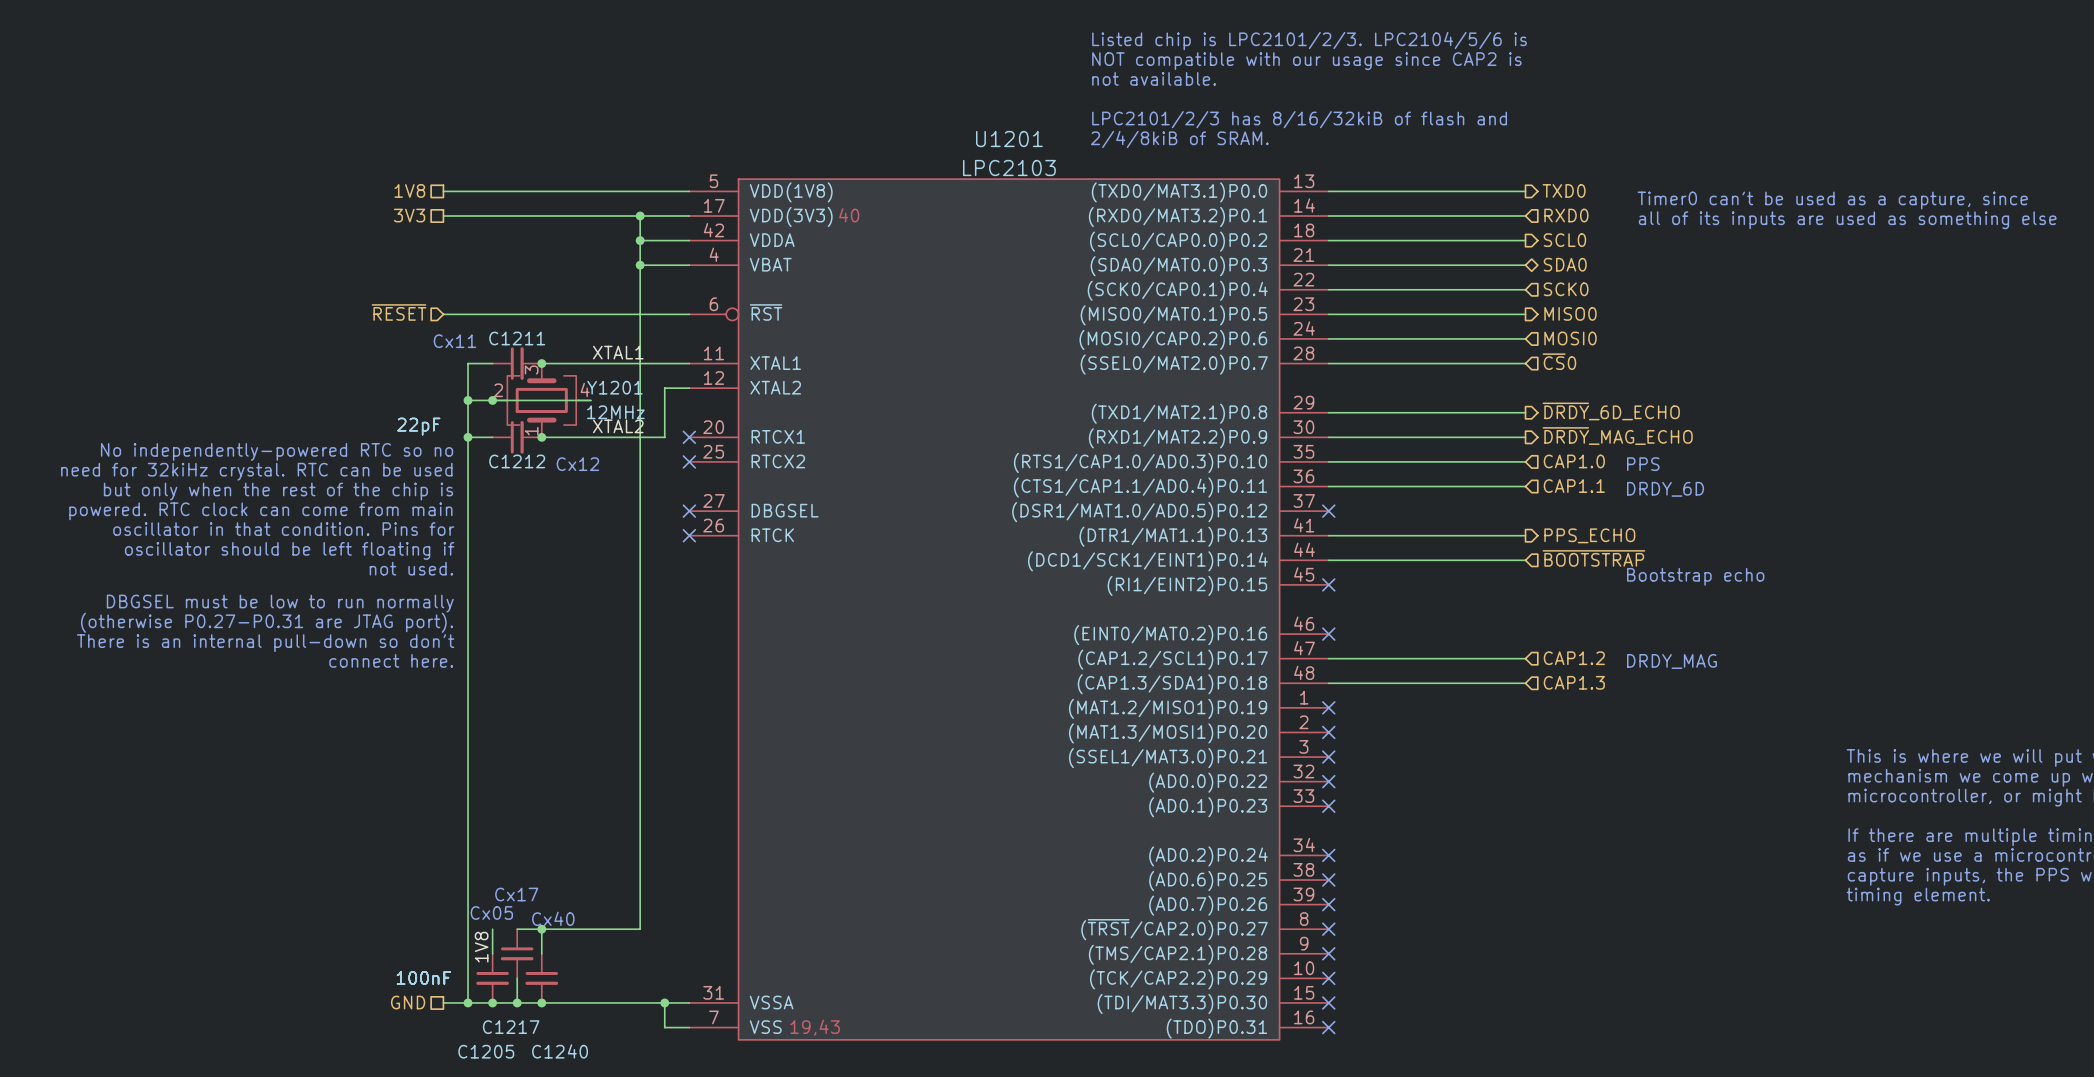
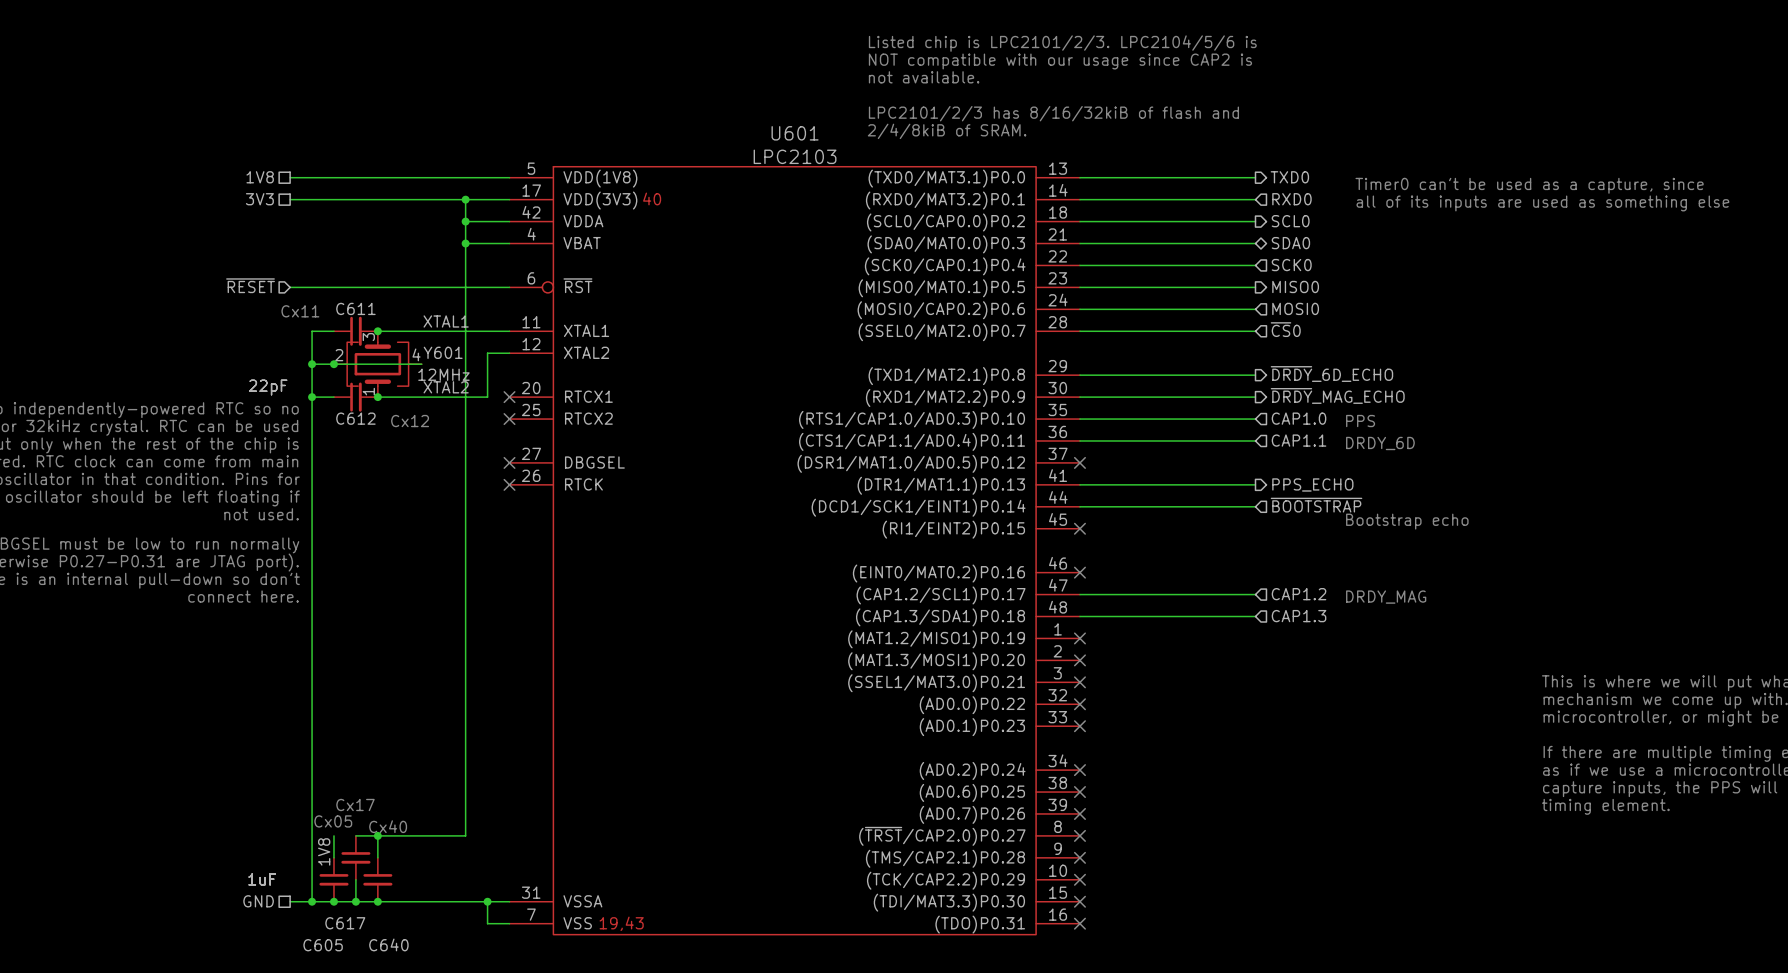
U1201 name: U1201 (1009, 139) -> U601 (795, 133)
C1211 name: C1211 (517, 338) -> C611 (355, 308)
Y1201 name: Y1201 (614, 387) -> Y601 (443, 352)
C1212 name: C1212 (517, 461) -> C612 (355, 418)
C1205 value: 100nF (423, 977) -> 1uF (262, 879)
C1217 value: 100nF (423, 977) -> 1uF (262, 879)
C1240 value: 100nF (423, 977) -> 1uF (262, 879)
C1217 name: C1217 (511, 1027) -> C617 (345, 923)
C1205 name: C1205 (486, 1051) -> C605 (323, 945)
C1240 name: C1240 (560, 1051) -> C640 (388, 944)

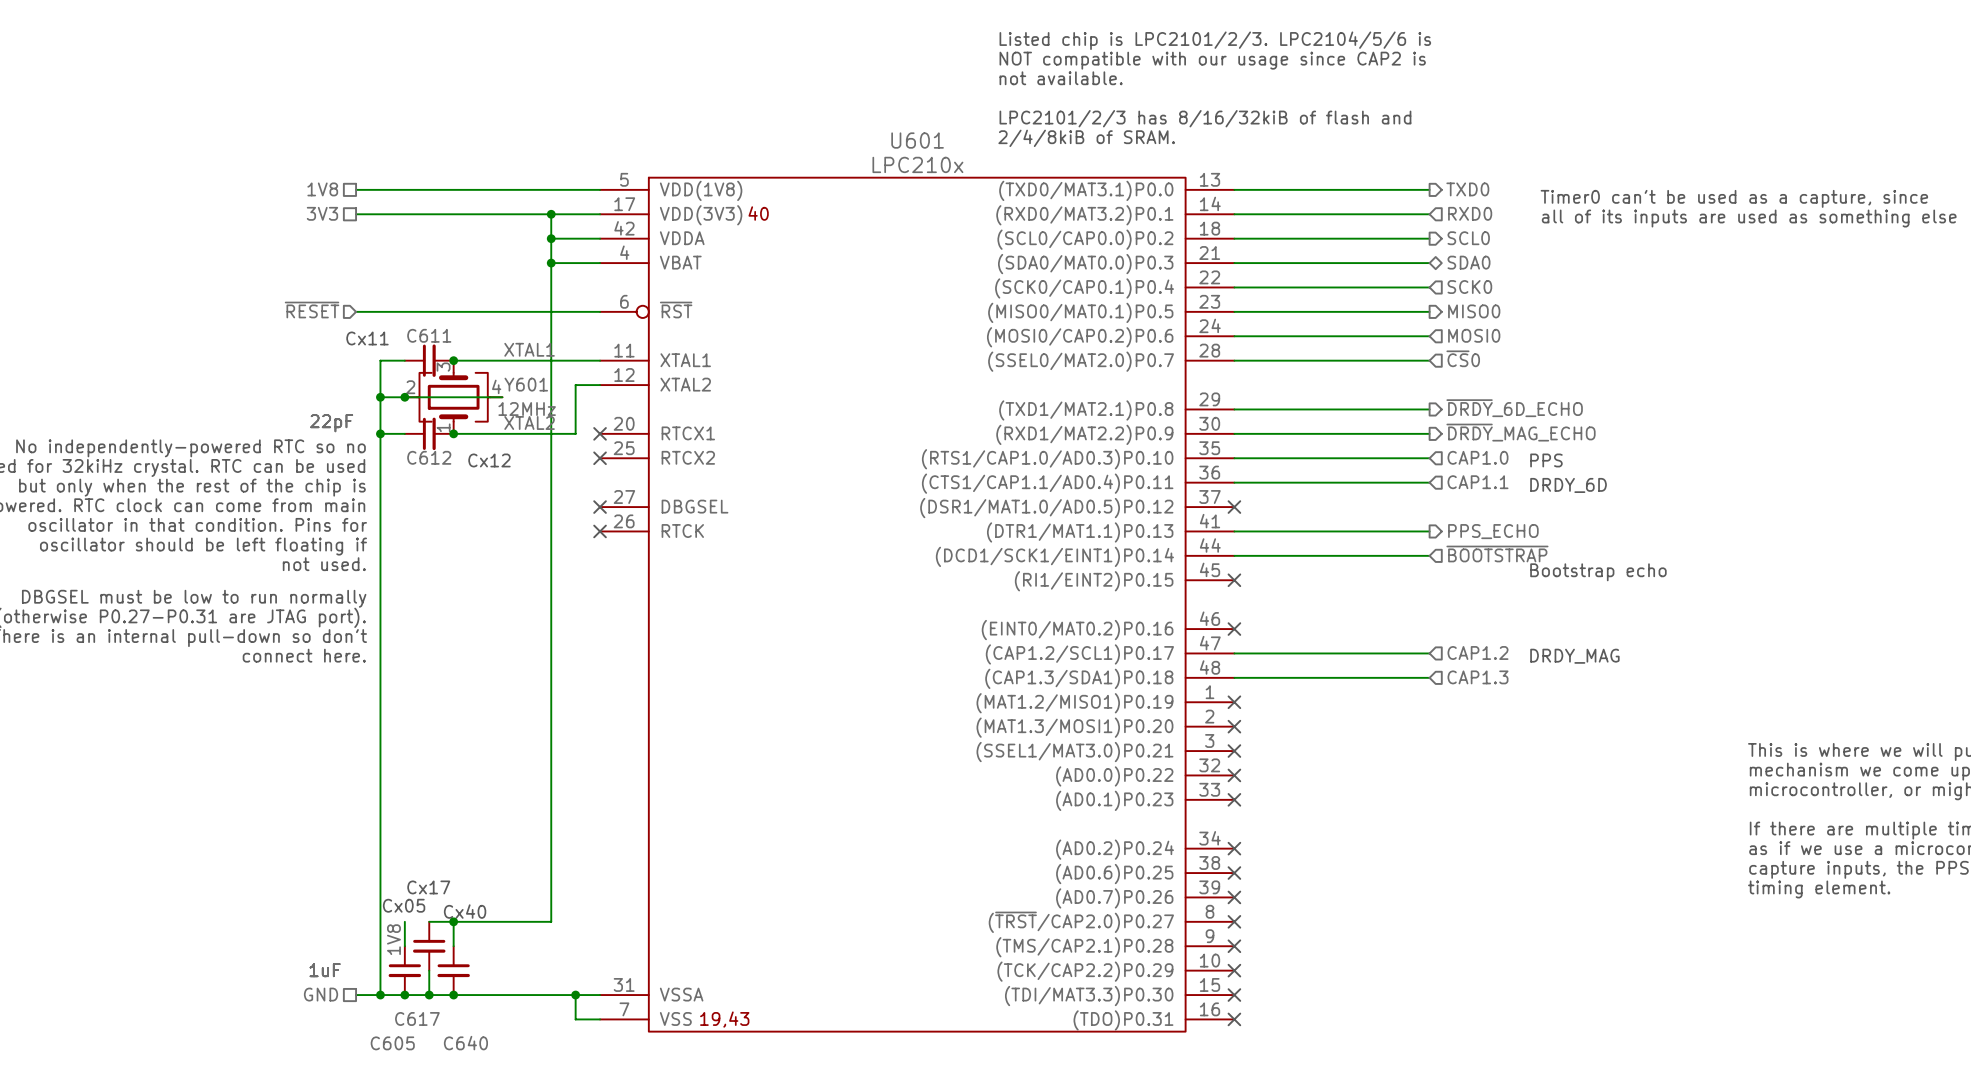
U601 value: LPC2103 (795, 156) -> LPC210x (917, 164)

